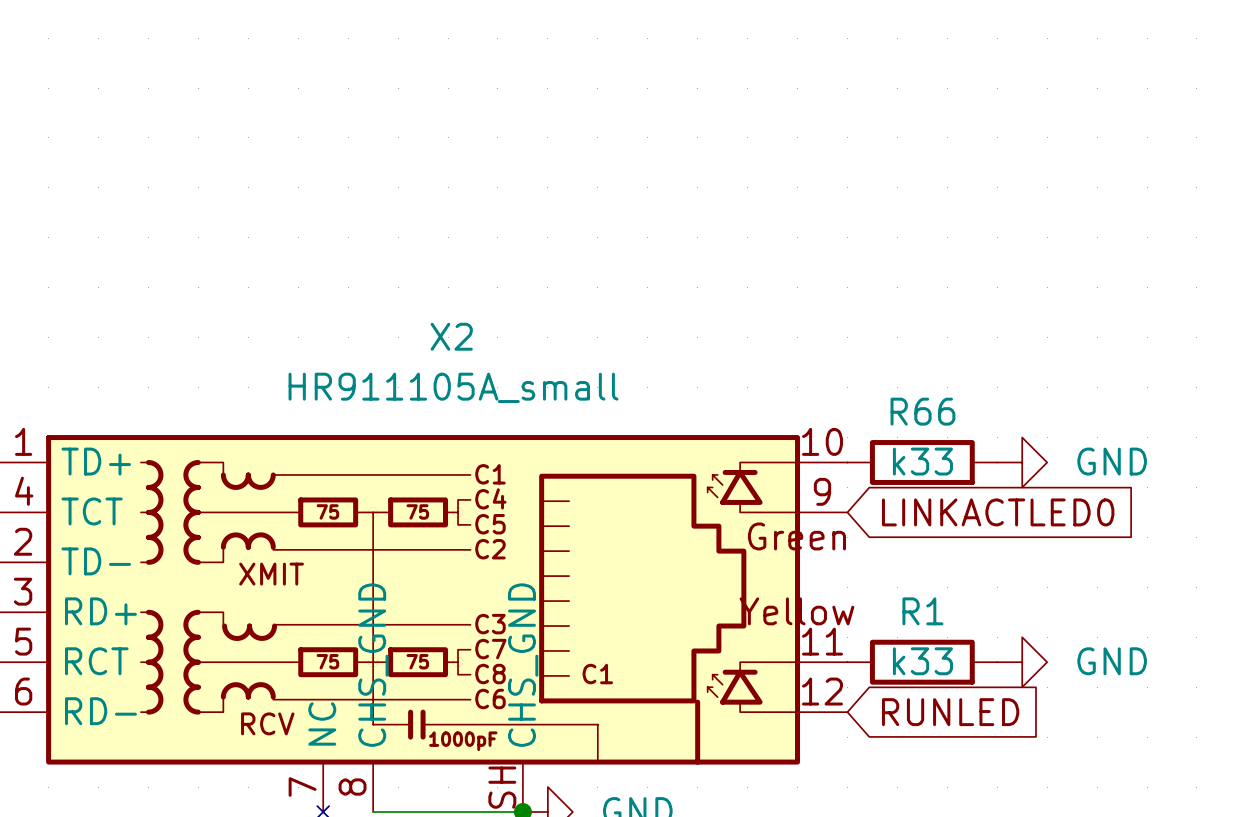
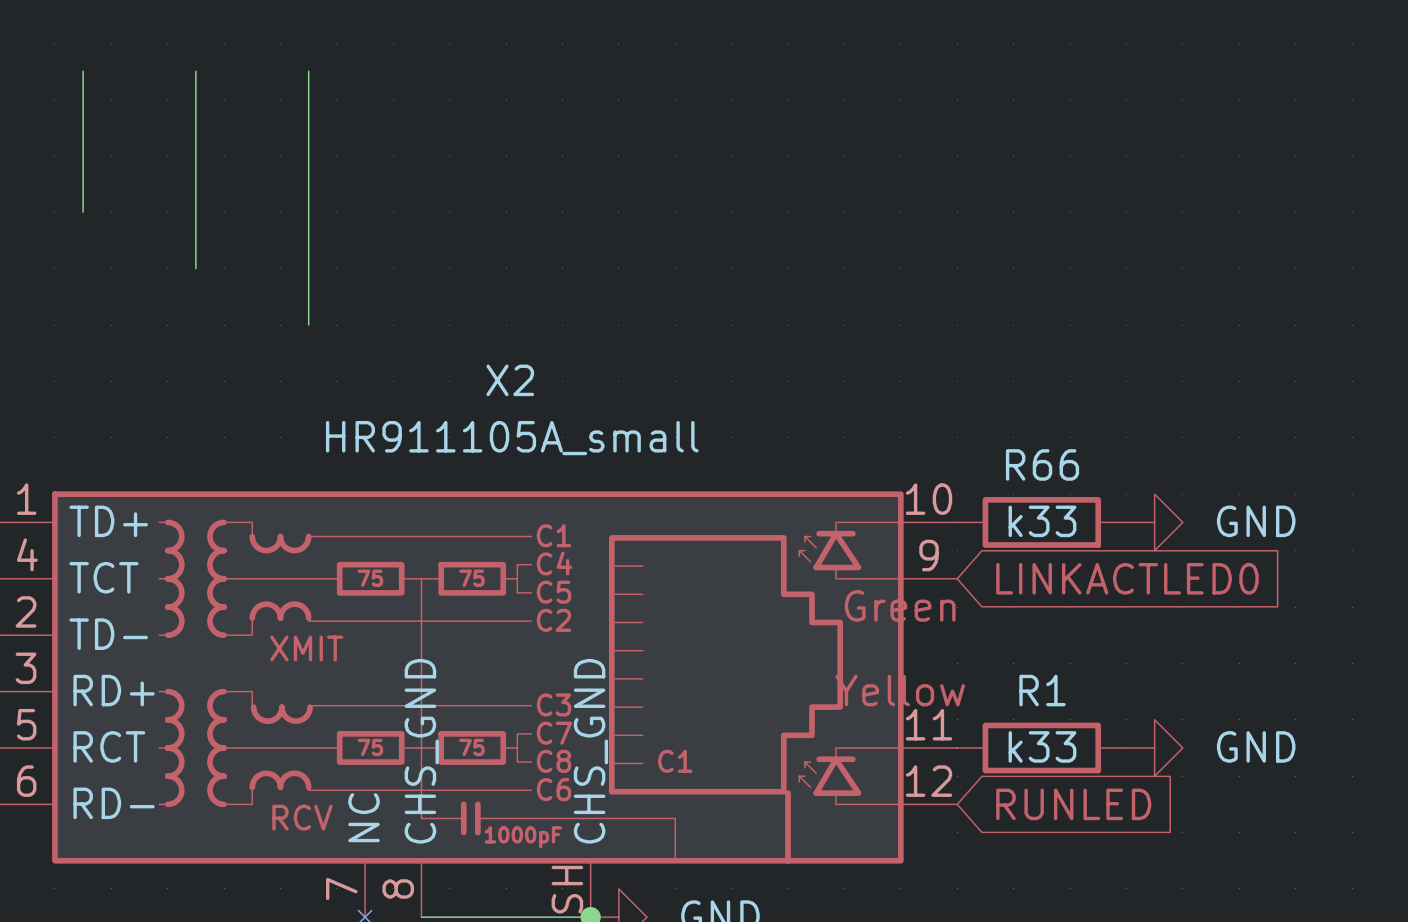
wire: none -> (83, 71) (83, 212)
wire: none -> (195, 71) (195, 268)
wire: none -> (308, 71) (308, 325)

